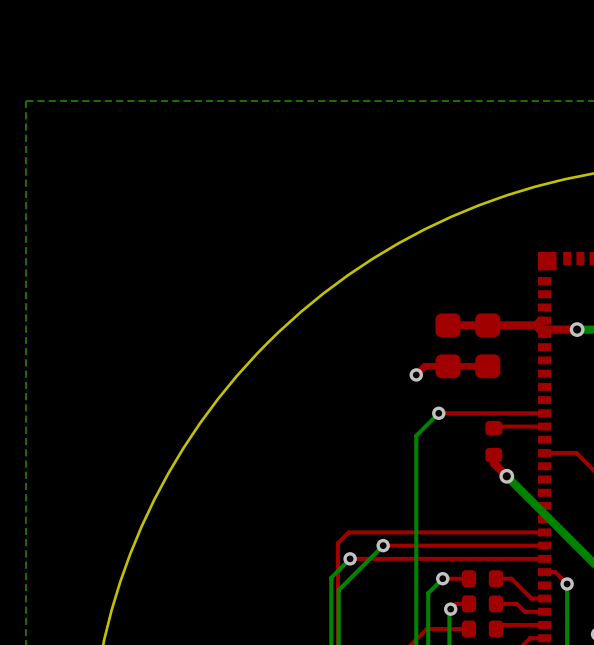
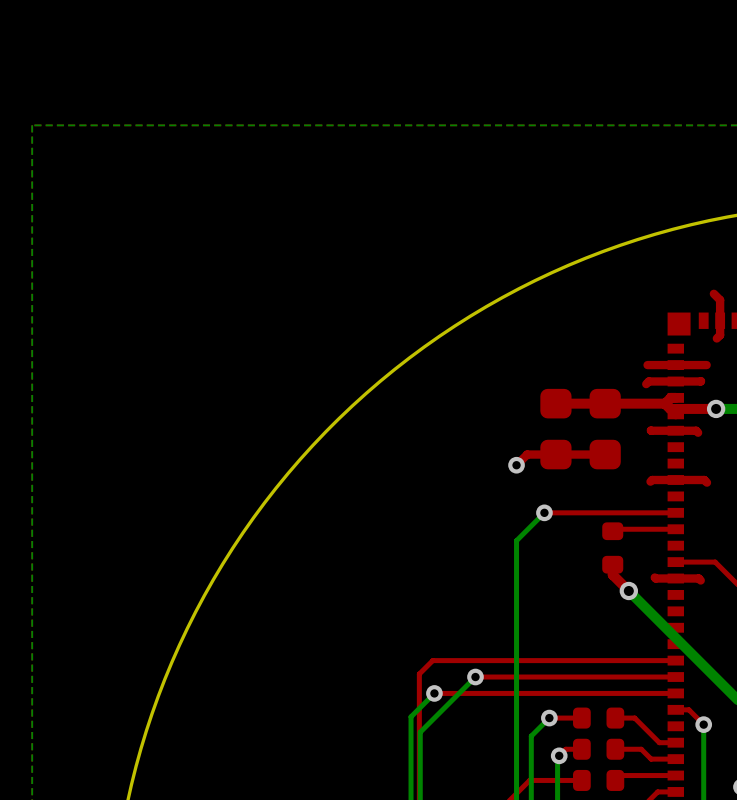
top track: none -> (713, 293) (720, 300) (720, 335) (716, 338)
top track: none -> (706, 365) (647, 365)
top track: none -> (700, 381) (648, 381) (646, 384)
top track: none -> (651, 430) (696, 430) (698, 432)
top track: none -> (650, 481) (652, 480) (704, 480) (706, 482)
top track: none -> (654, 577) (698, 578) (700, 580)

